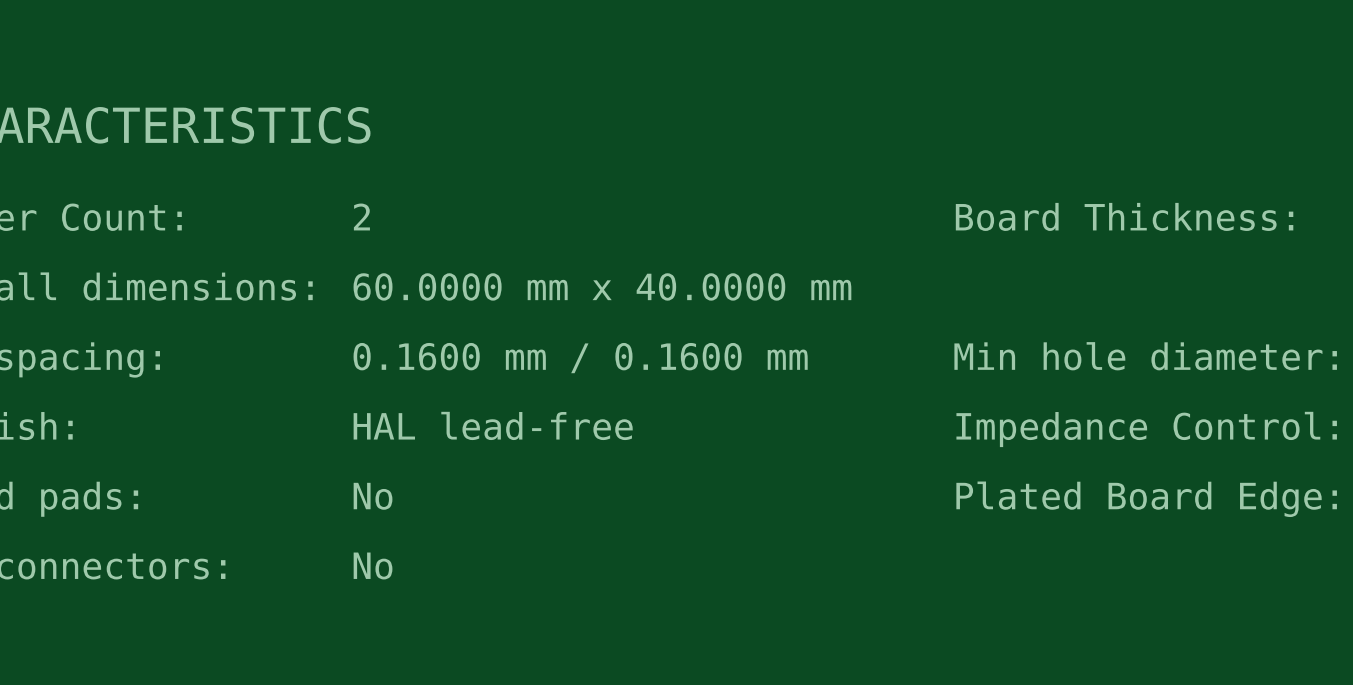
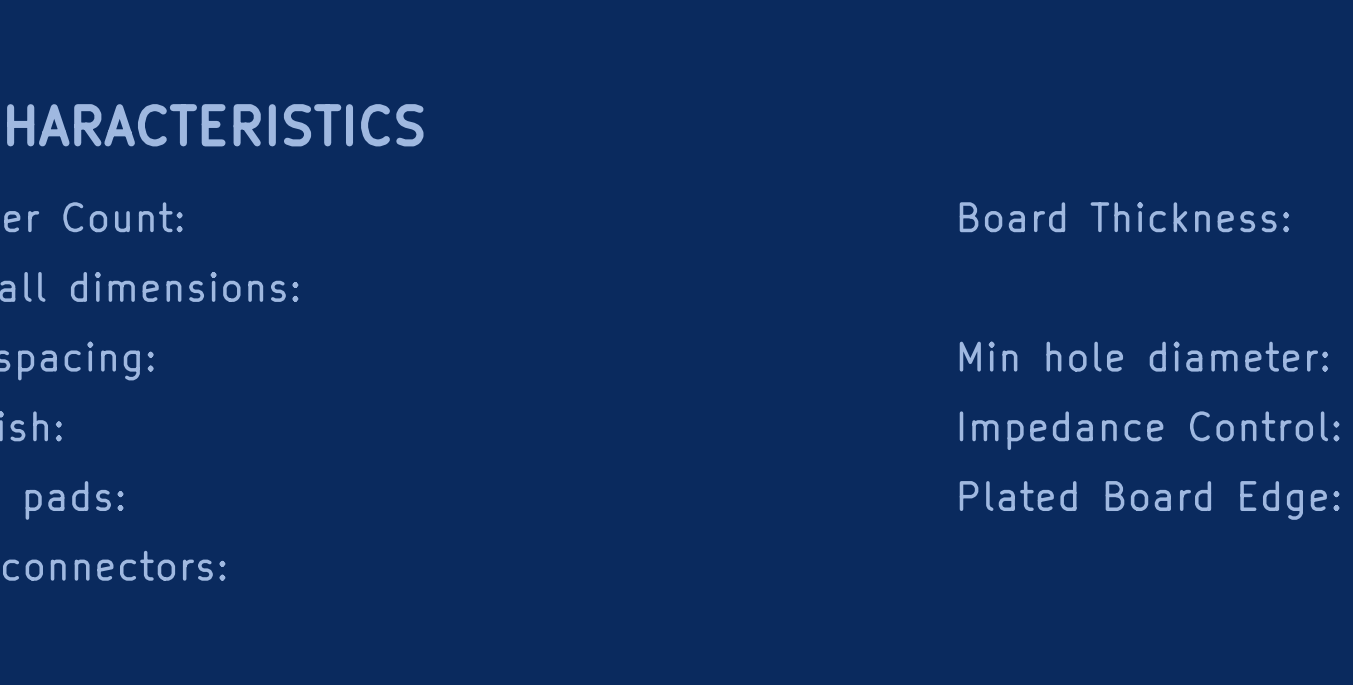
text: 2 (361, 216) -> none
text: 60.0000 mm x 40.0000 mm (602, 286) -> none
text: 0.1600 mm / 0.1600 mm (580, 358) -> none
text: HAL lead-free (493, 425) -> none
text: No (373, 496) -> none
text: No (373, 566) -> none

